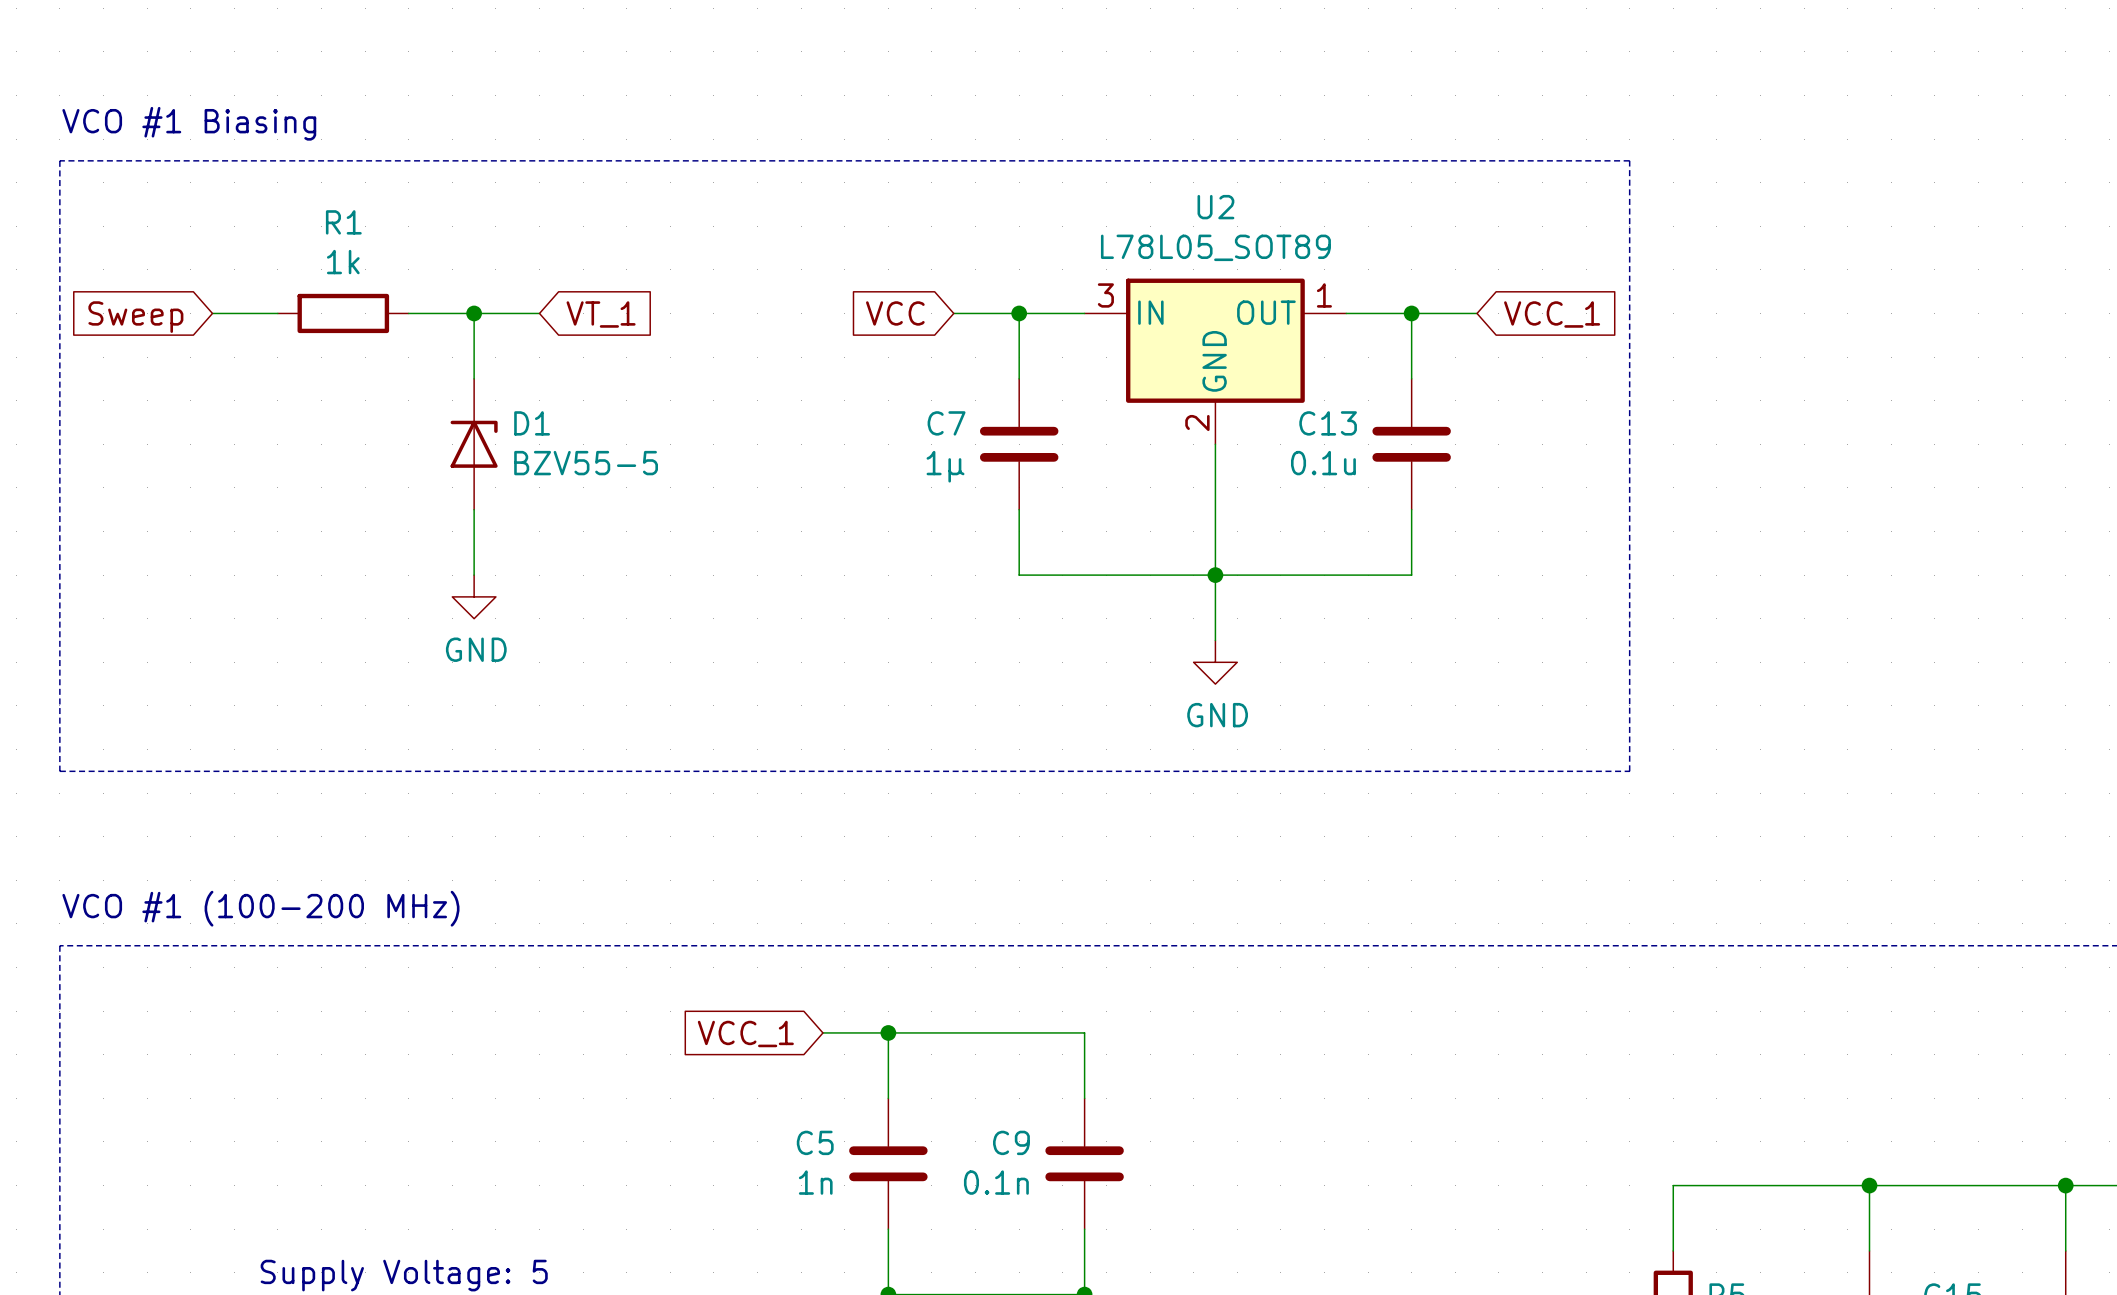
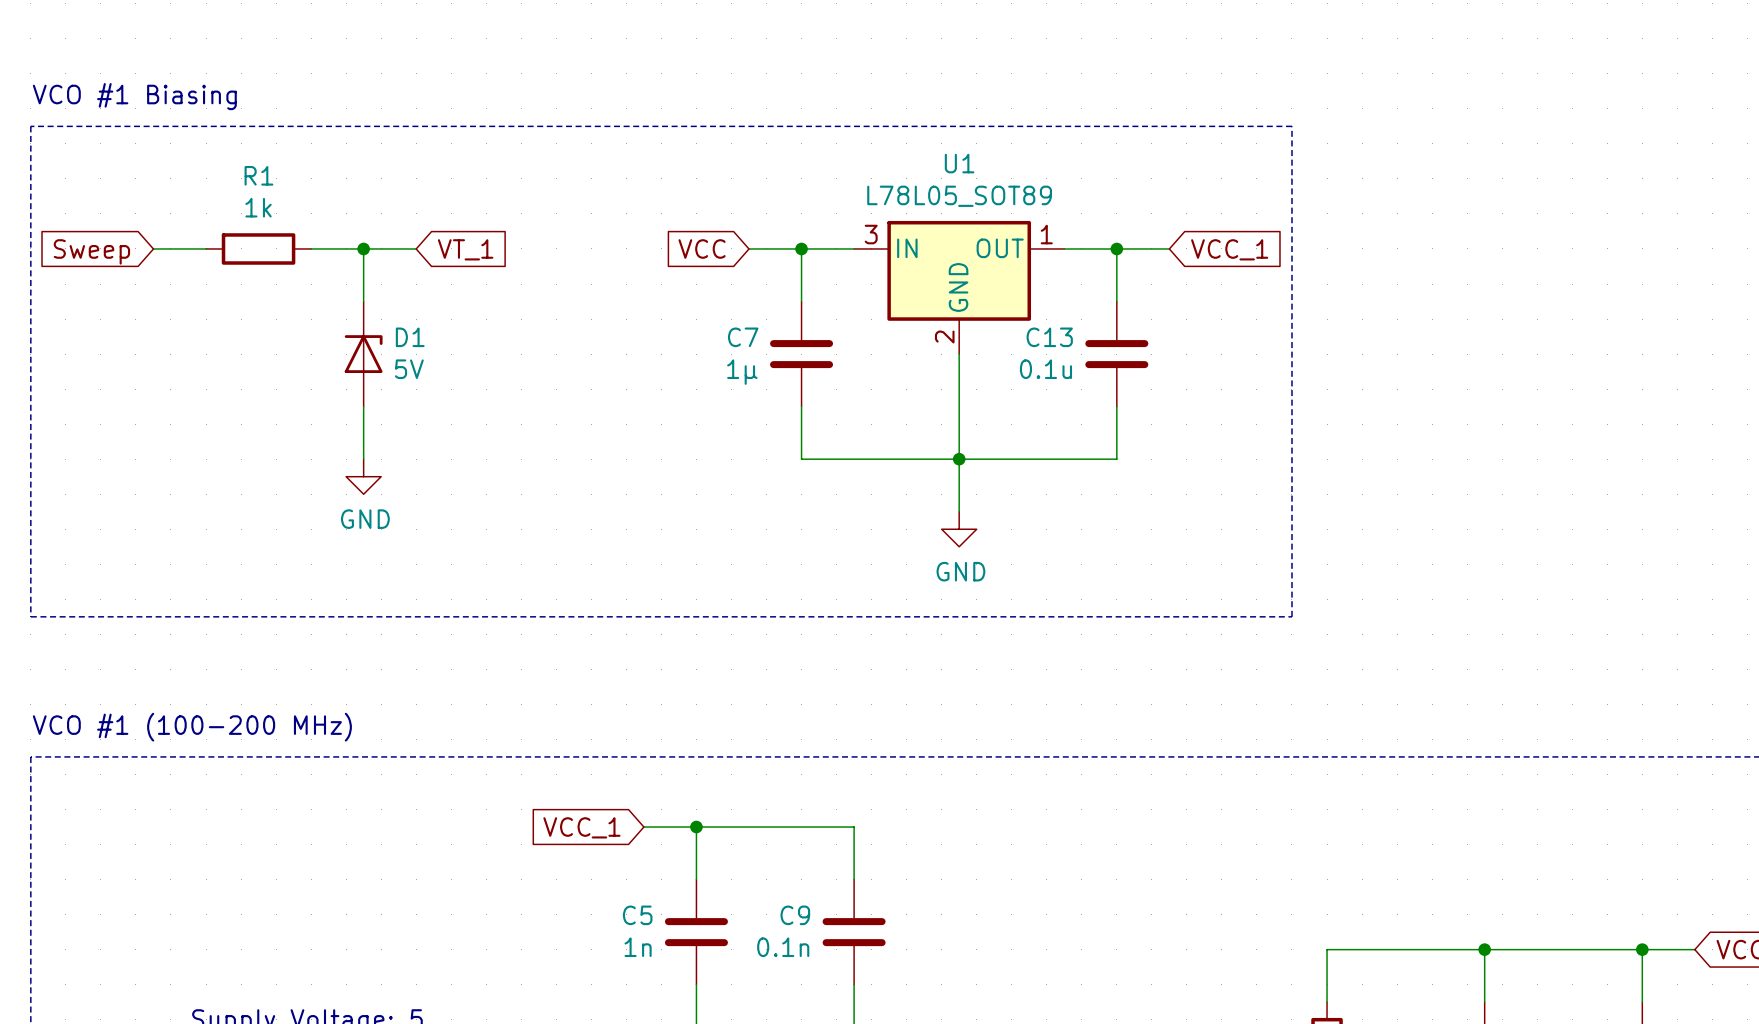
U2 name: U2 (1215, 207) -> U1 (959, 163)
D1 value: BZV55-5 (586, 463) -> 5V (409, 369)

